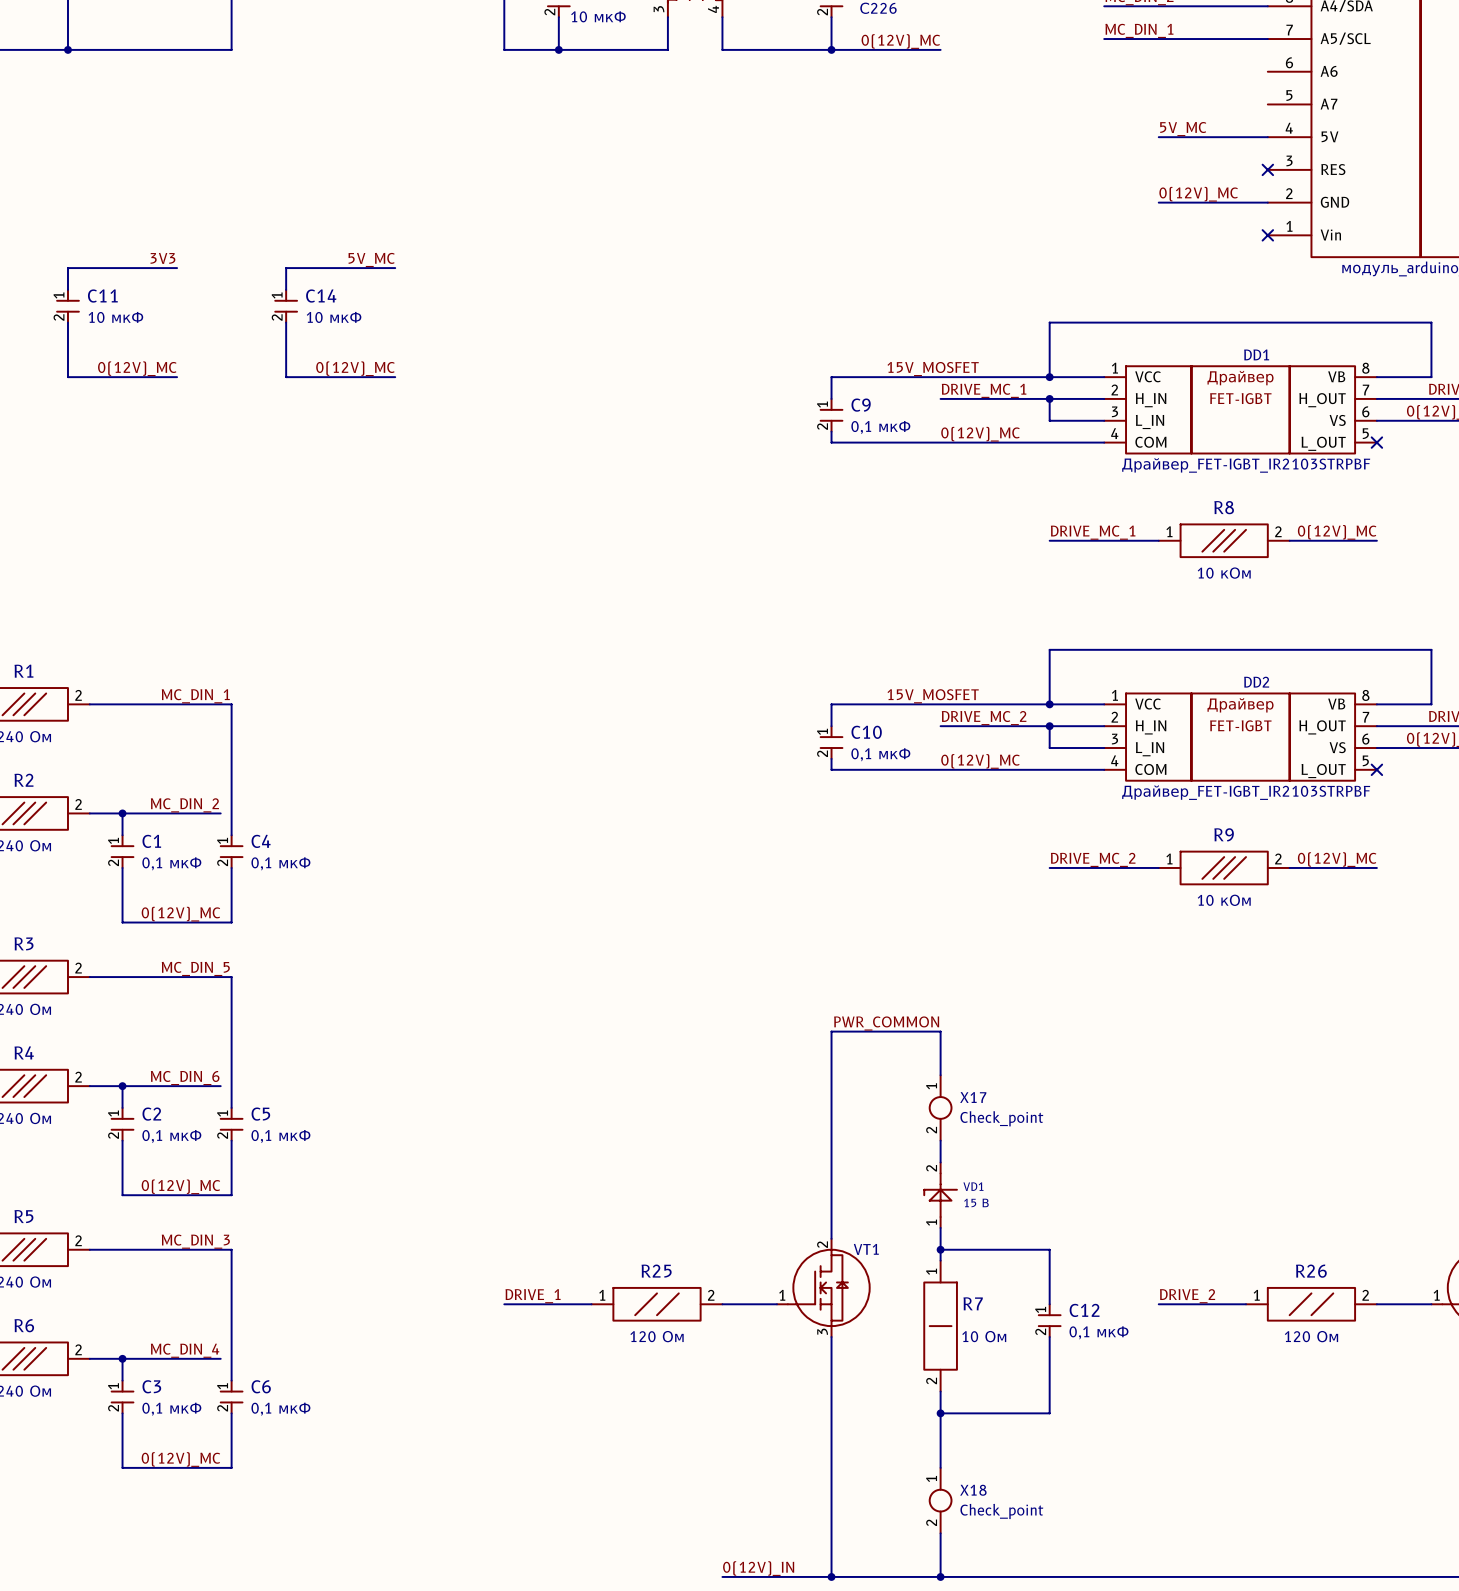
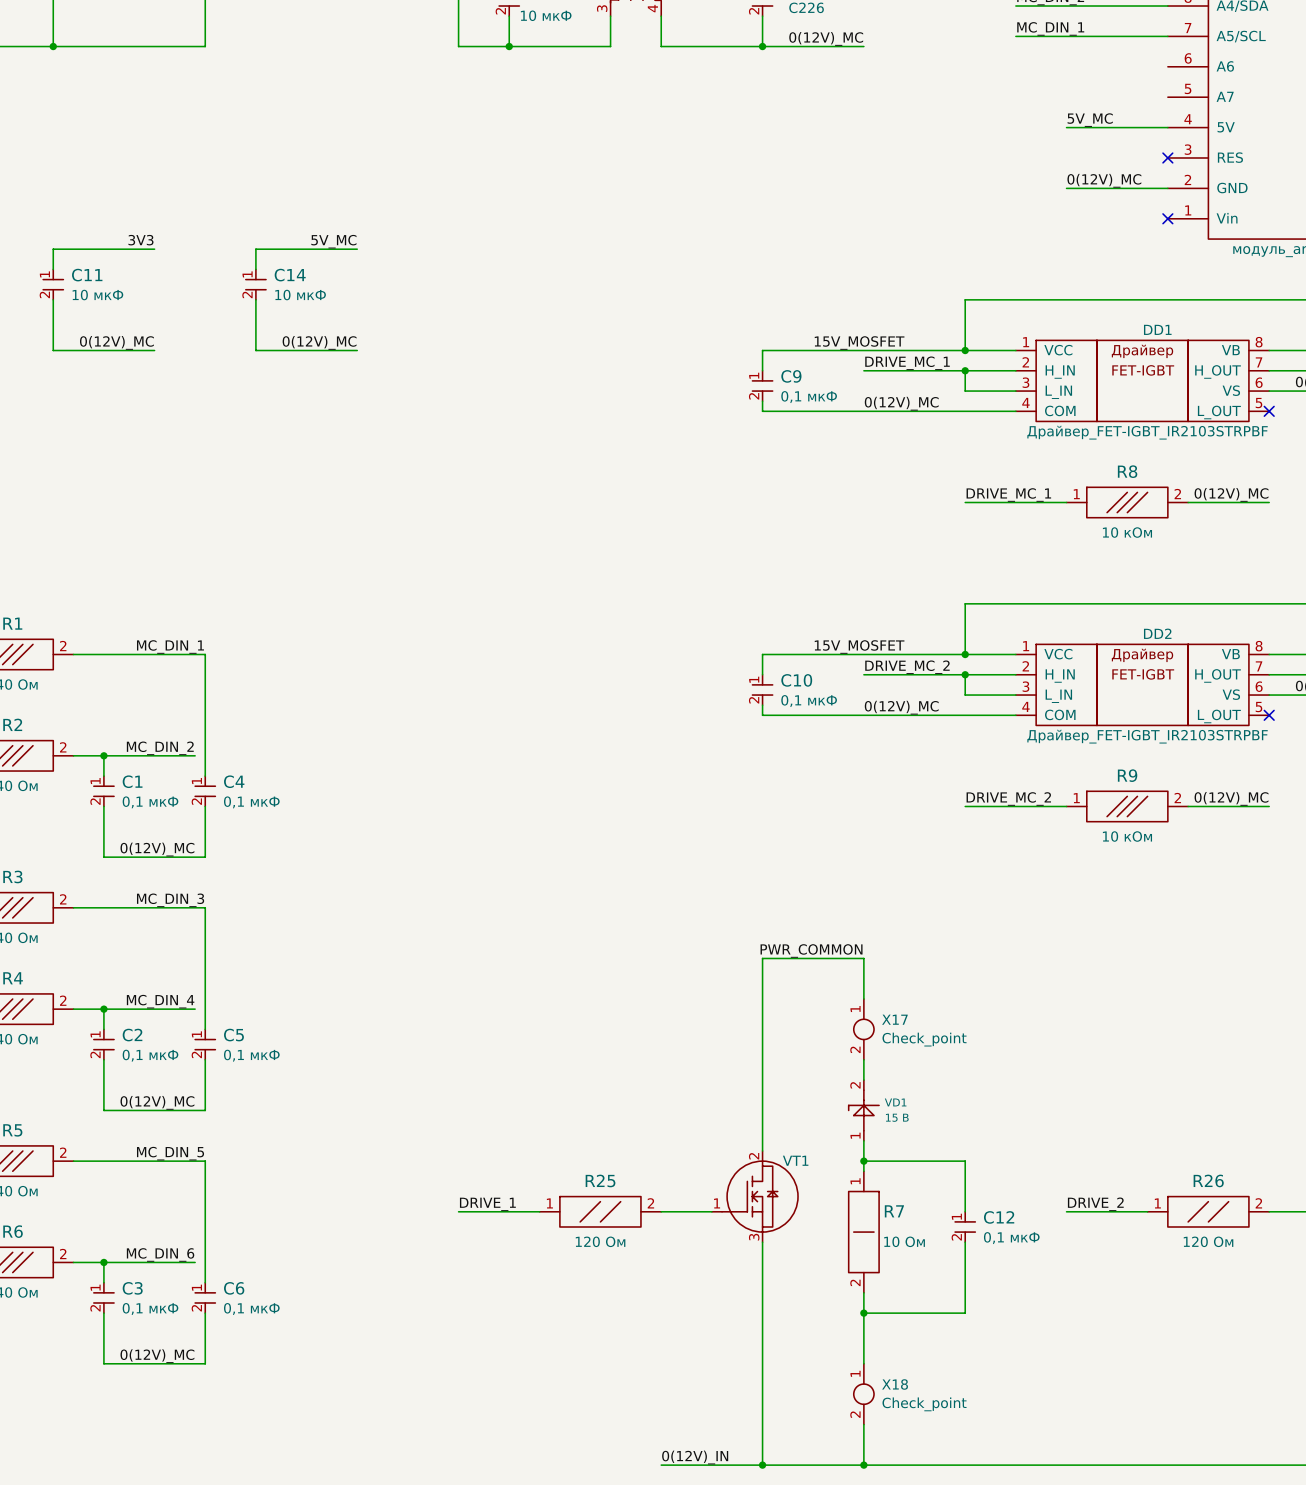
label: MC_DIN_5 (195, 968) -> MC_DIN_3 (170, 900)
label: MC_DIN_6 (185, 1078) -> MC_DIN_4 (160, 1001)
label: MC_DIN_3 (195, 1241) -> MC_DIN_5 (170, 1153)
label: MC_DIN_4 (185, 1350) -> MC_DIN_6 (160, 1254)

